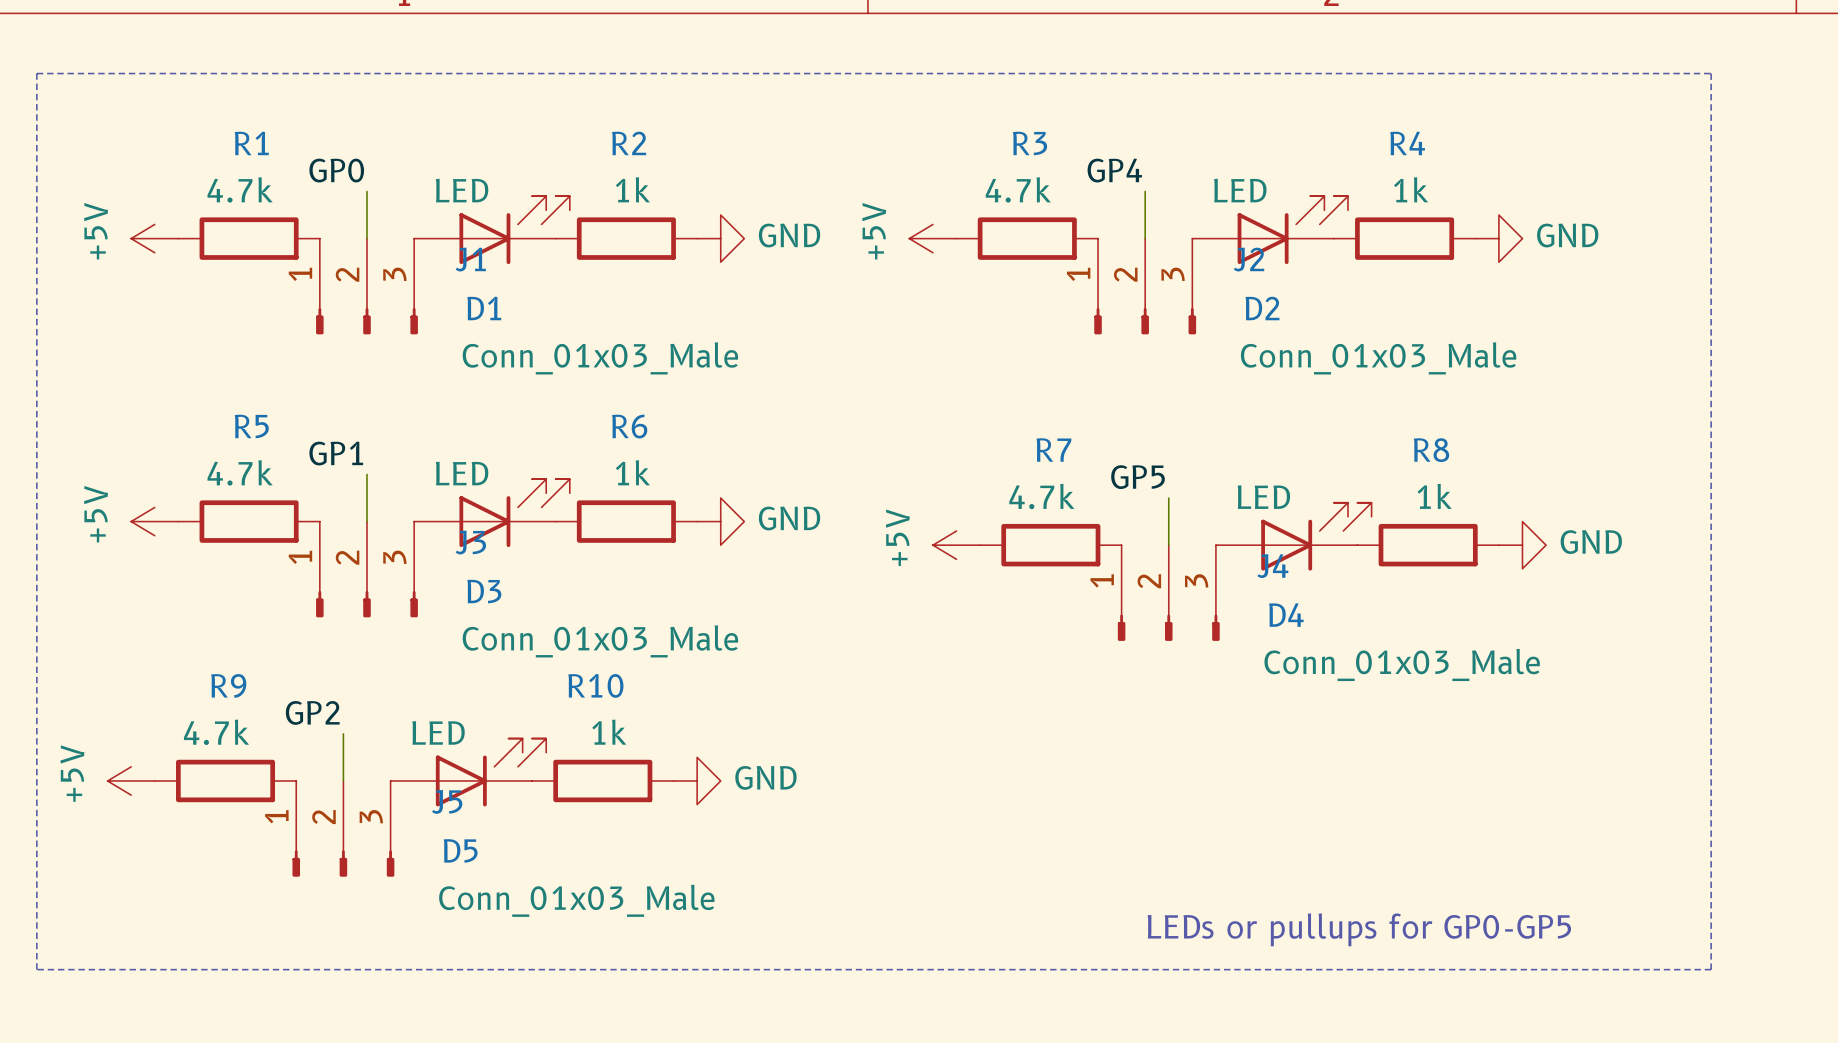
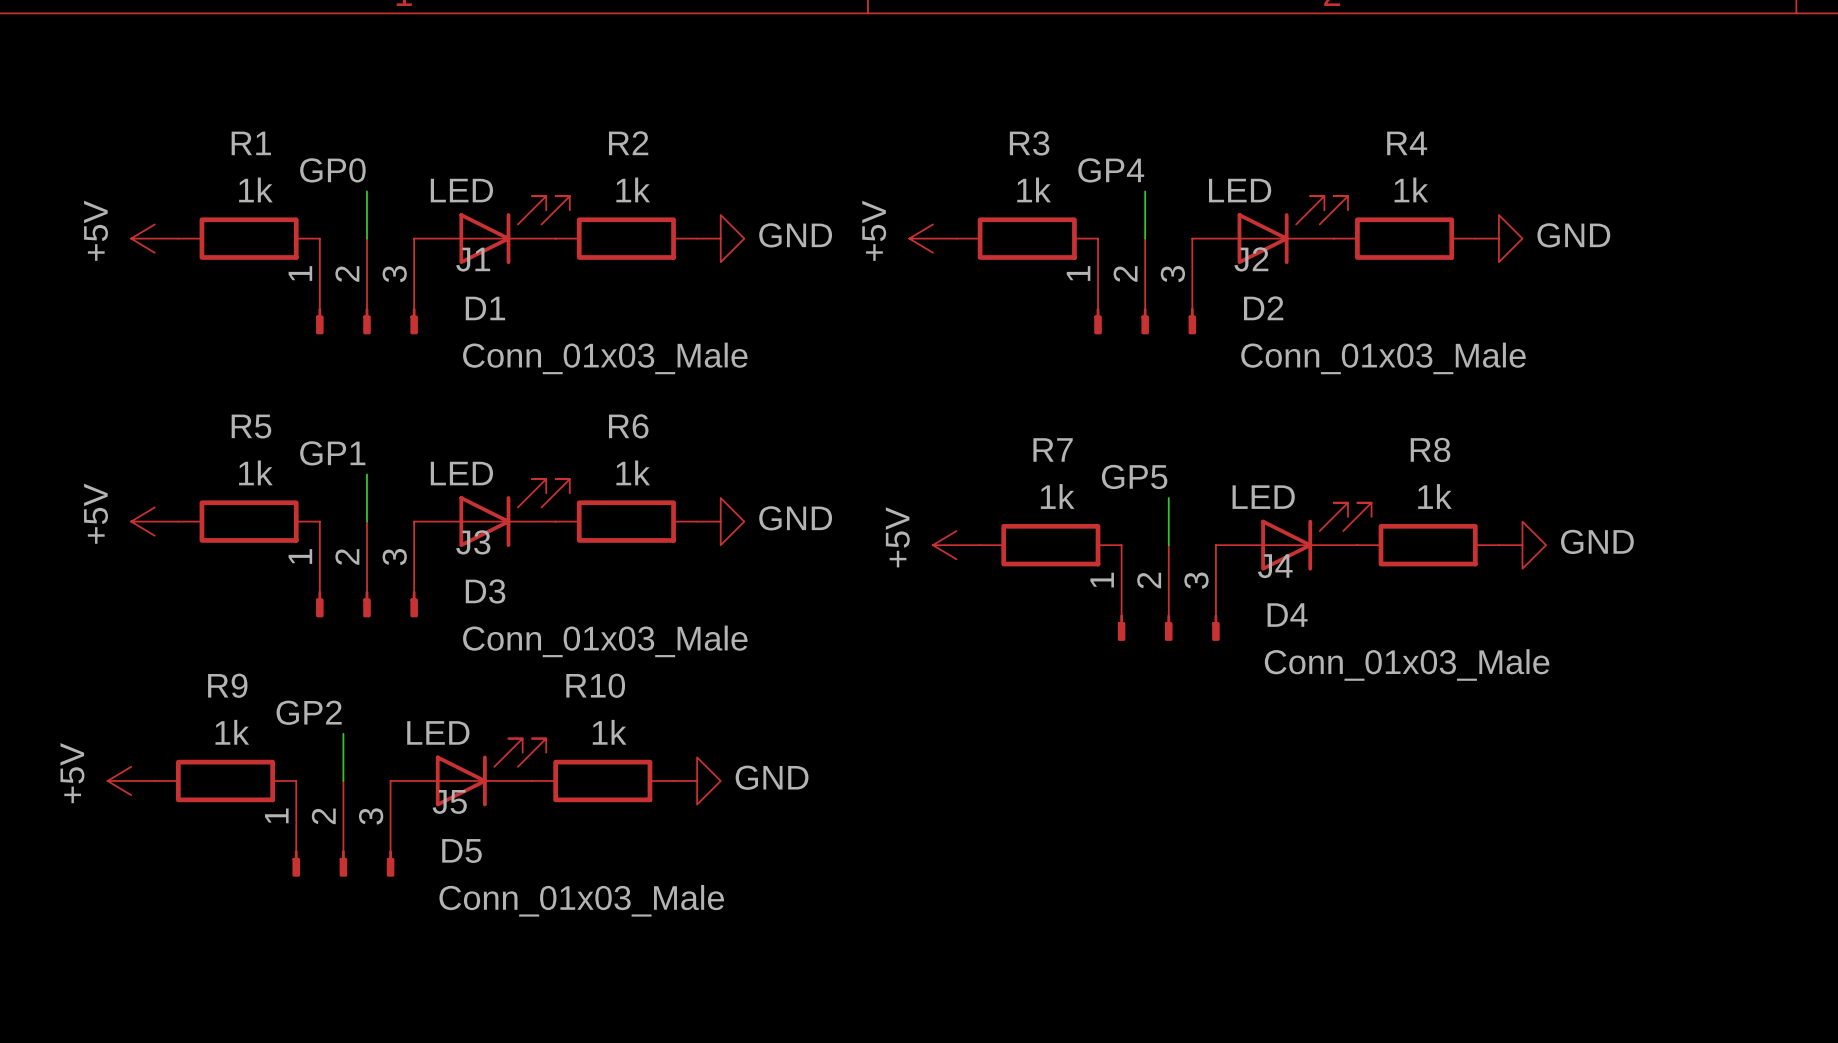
line: (36, 73) (1711, 73) (1711, 969) (36, 969) (36, 73) -> none
R1 value: 4.7k (240, 189) -> 1k (255, 189)
R3 value: 4.7k (1018, 189) -> 1k (1034, 189)
R5 value: 4.7k (240, 472) -> 1k (255, 472)
R7 value: 4.7k (1041, 496) -> 1k (1057, 496)
R9 value: 4.7k (216, 732) -> 1k (232, 732)
text: LEDs or pullups for GP0-GP5 (1359, 929) -> none

